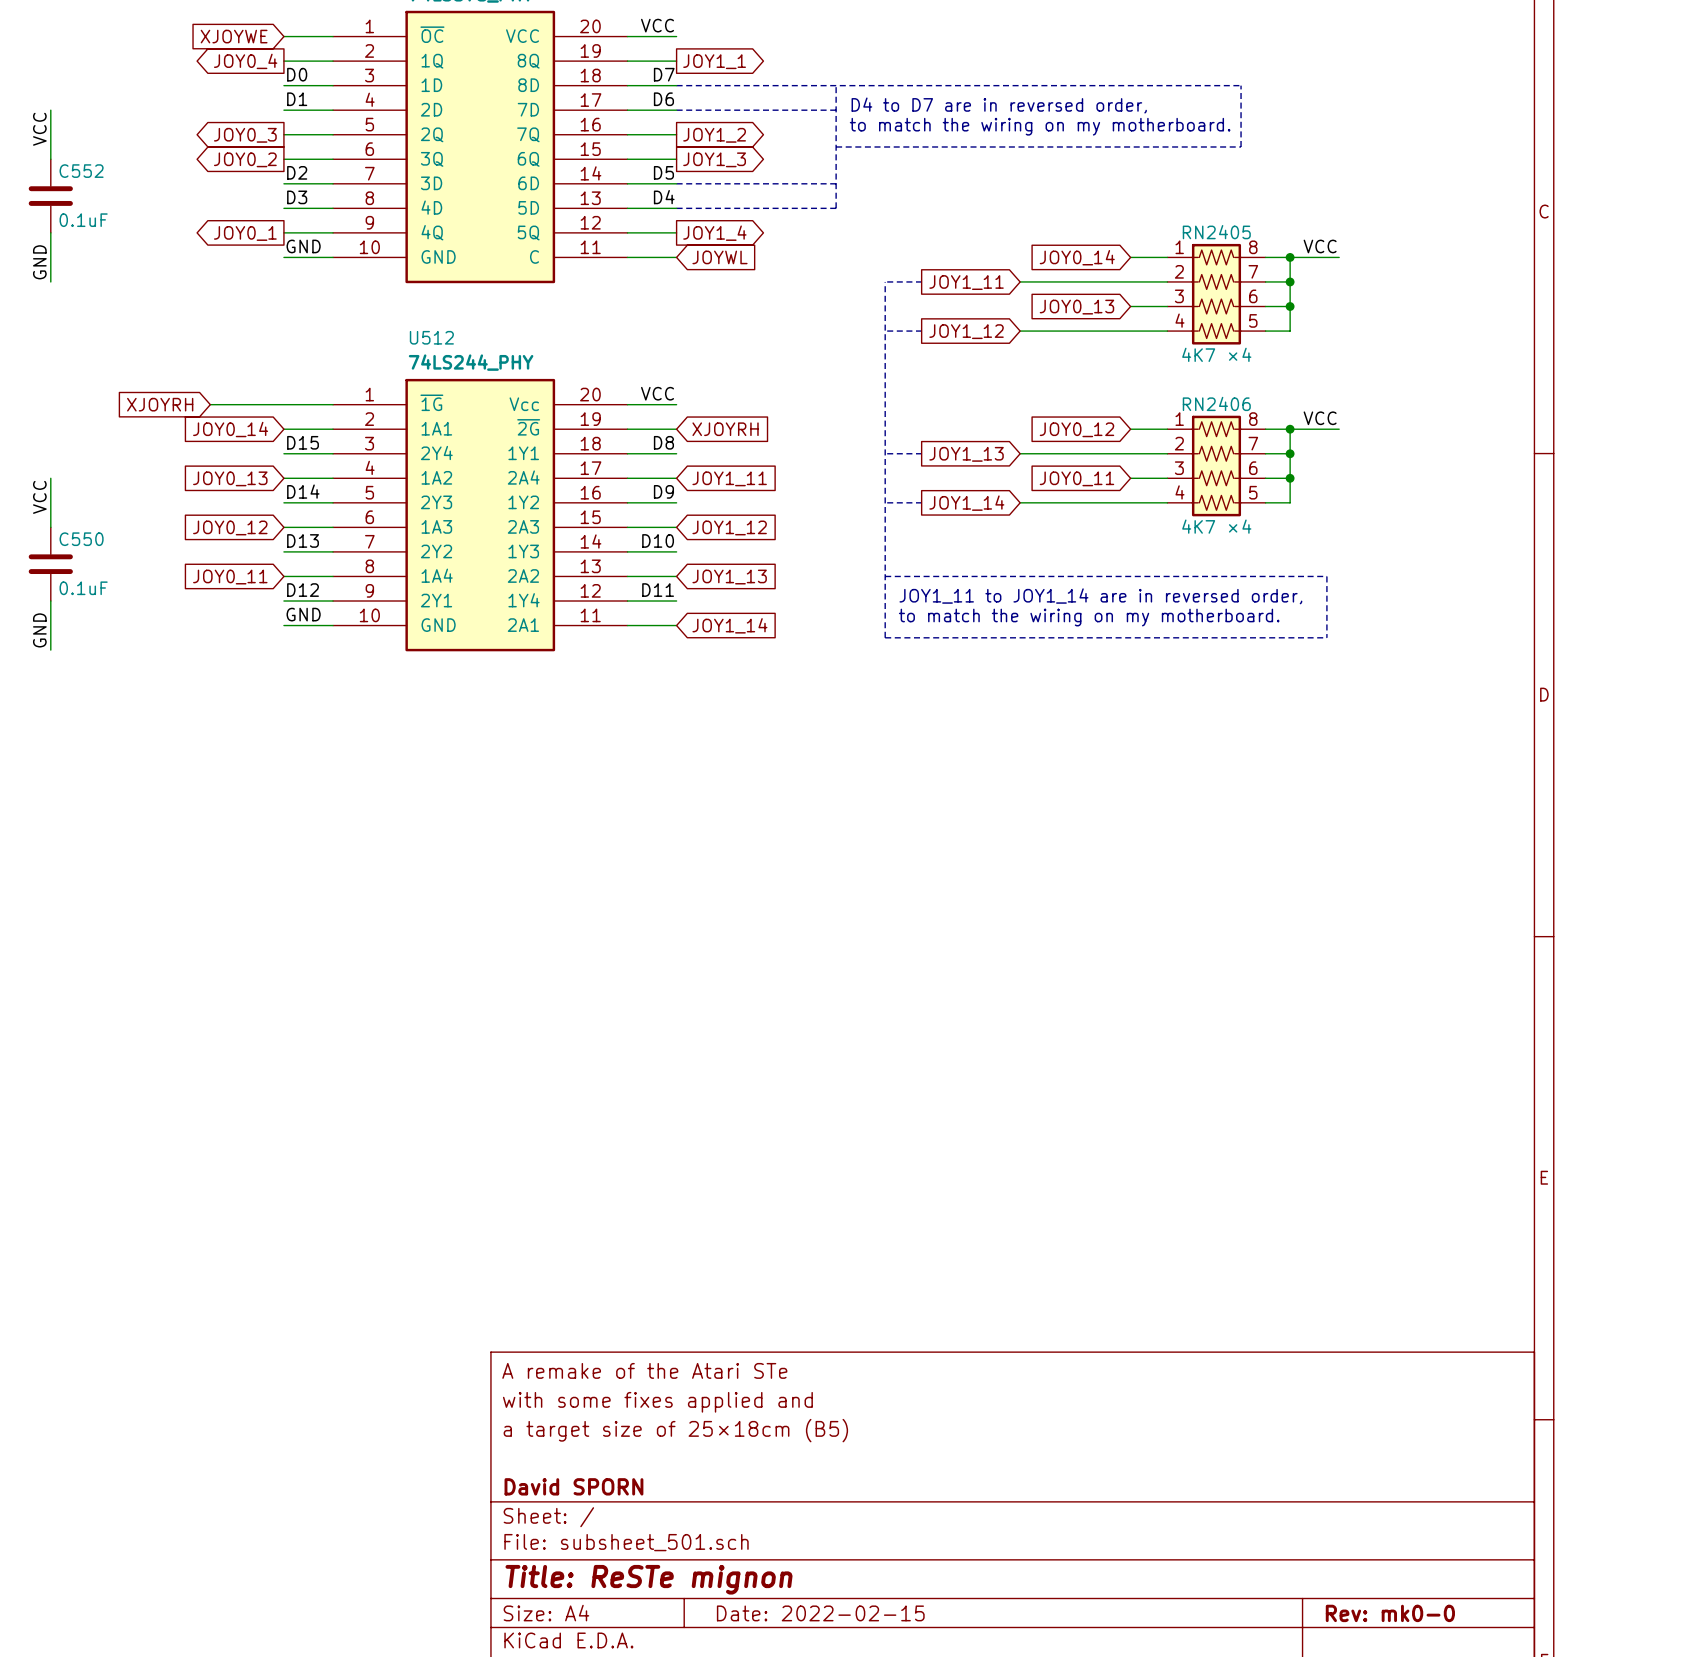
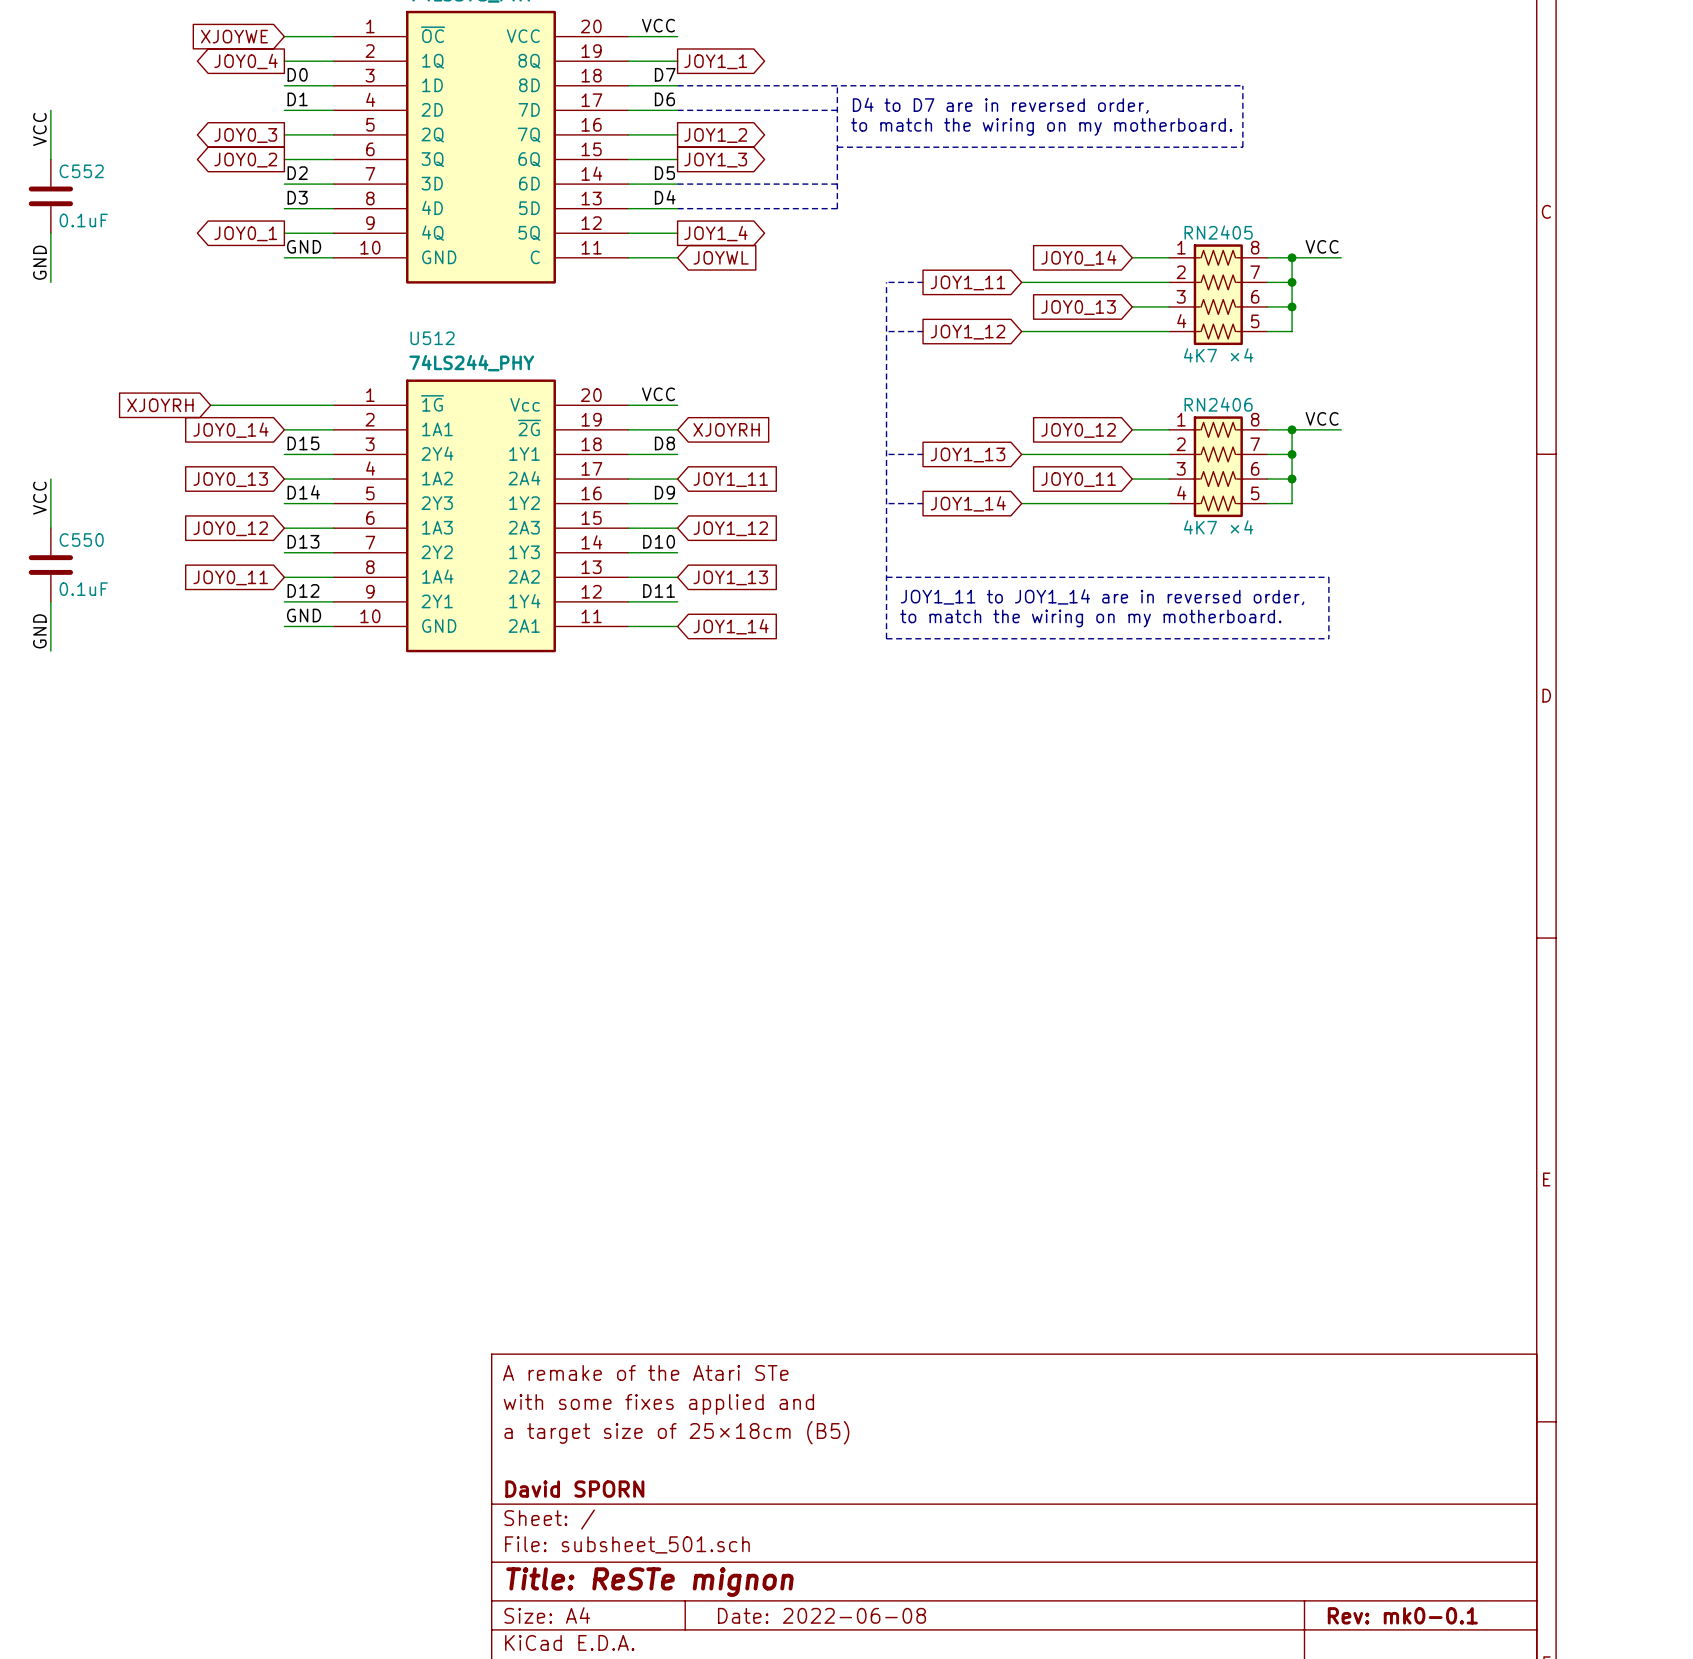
title block: Date: 2022-02-15 (820, 1613) -> Date: 2022-06-08 (822, 1615)
title block: Rev: mk0-0 (1390, 1613) -> Rev: mk0-0.1 (1402, 1615)

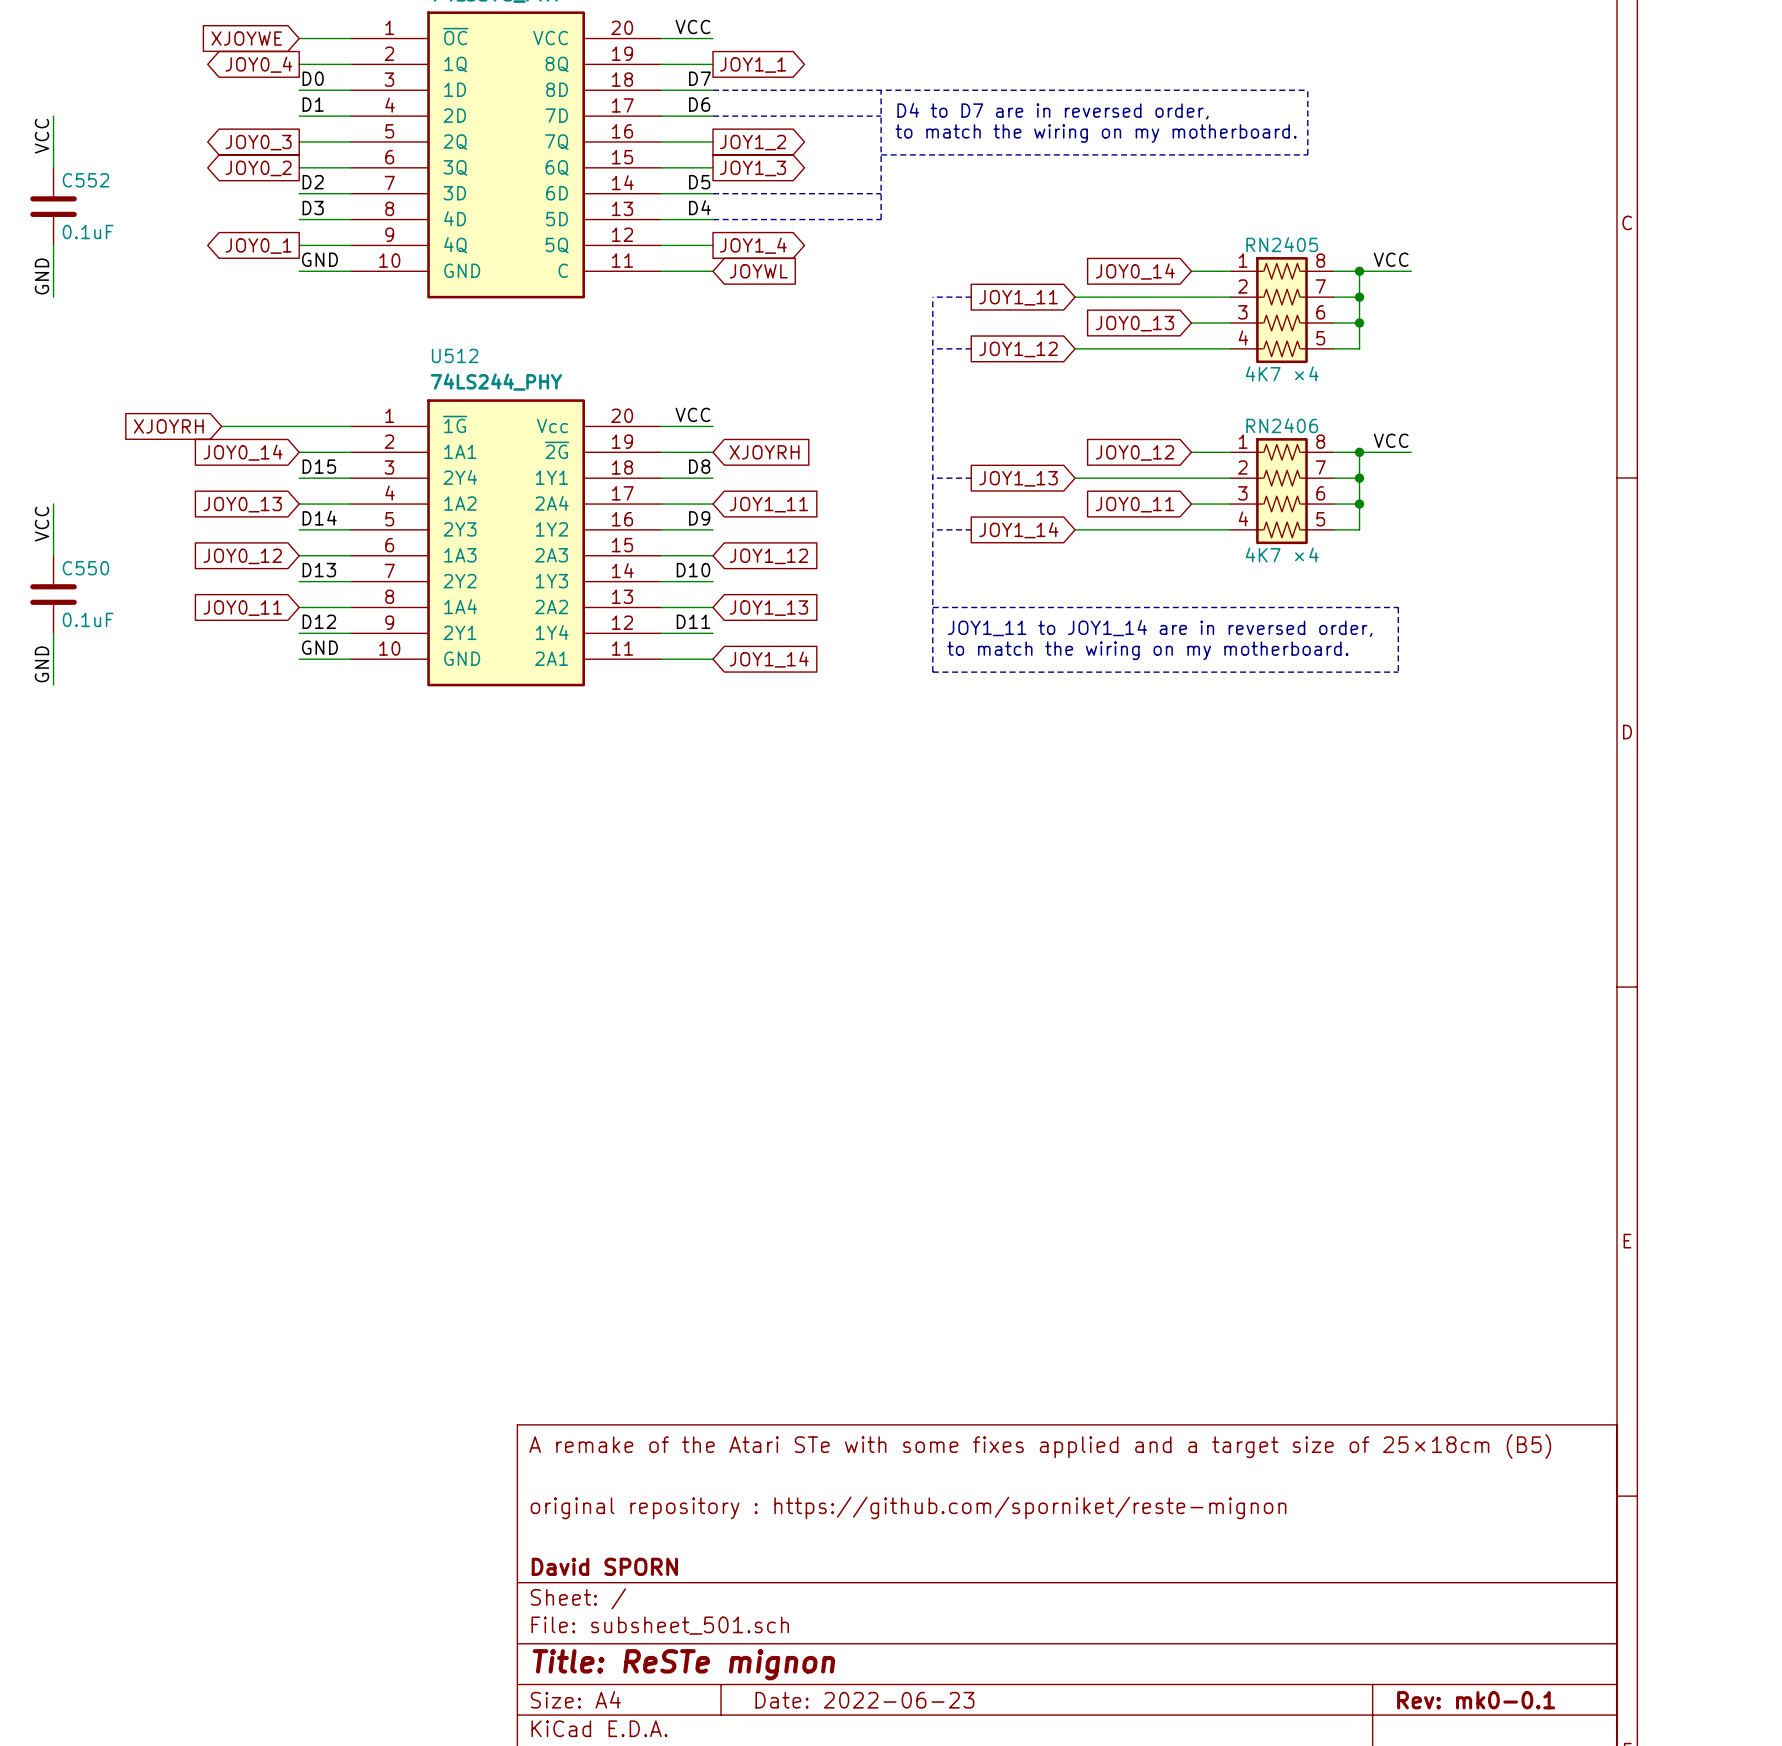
title block: A remake of the Atari STe (645, 1372) -> A remake of the Atari STe with some fixes applied and a target size of 25×18cm (B5) (1040, 1446)
title block: with some fixes applied and (658, 1404) -> none
title block: a target size of 25×18cm (B5) (676, 1432) -> original repository : https://github.com/sporniket/reste-mignon (908, 1507)
title block: Date: 2022-06-08 (822, 1615) -> Date: 2022-06-23 (864, 1700)

